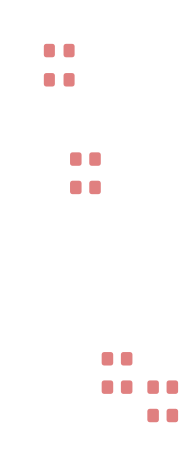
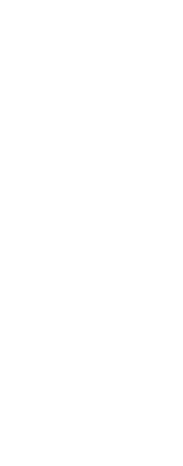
part: (59, 50) -> none
part: (59, 79) -> none
part: (85, 159) -> none
part: (85, 187) -> none
part: (117, 358) -> none
part: (117, 387) -> none
part: (162, 387) -> none
part: (162, 415) -> none

